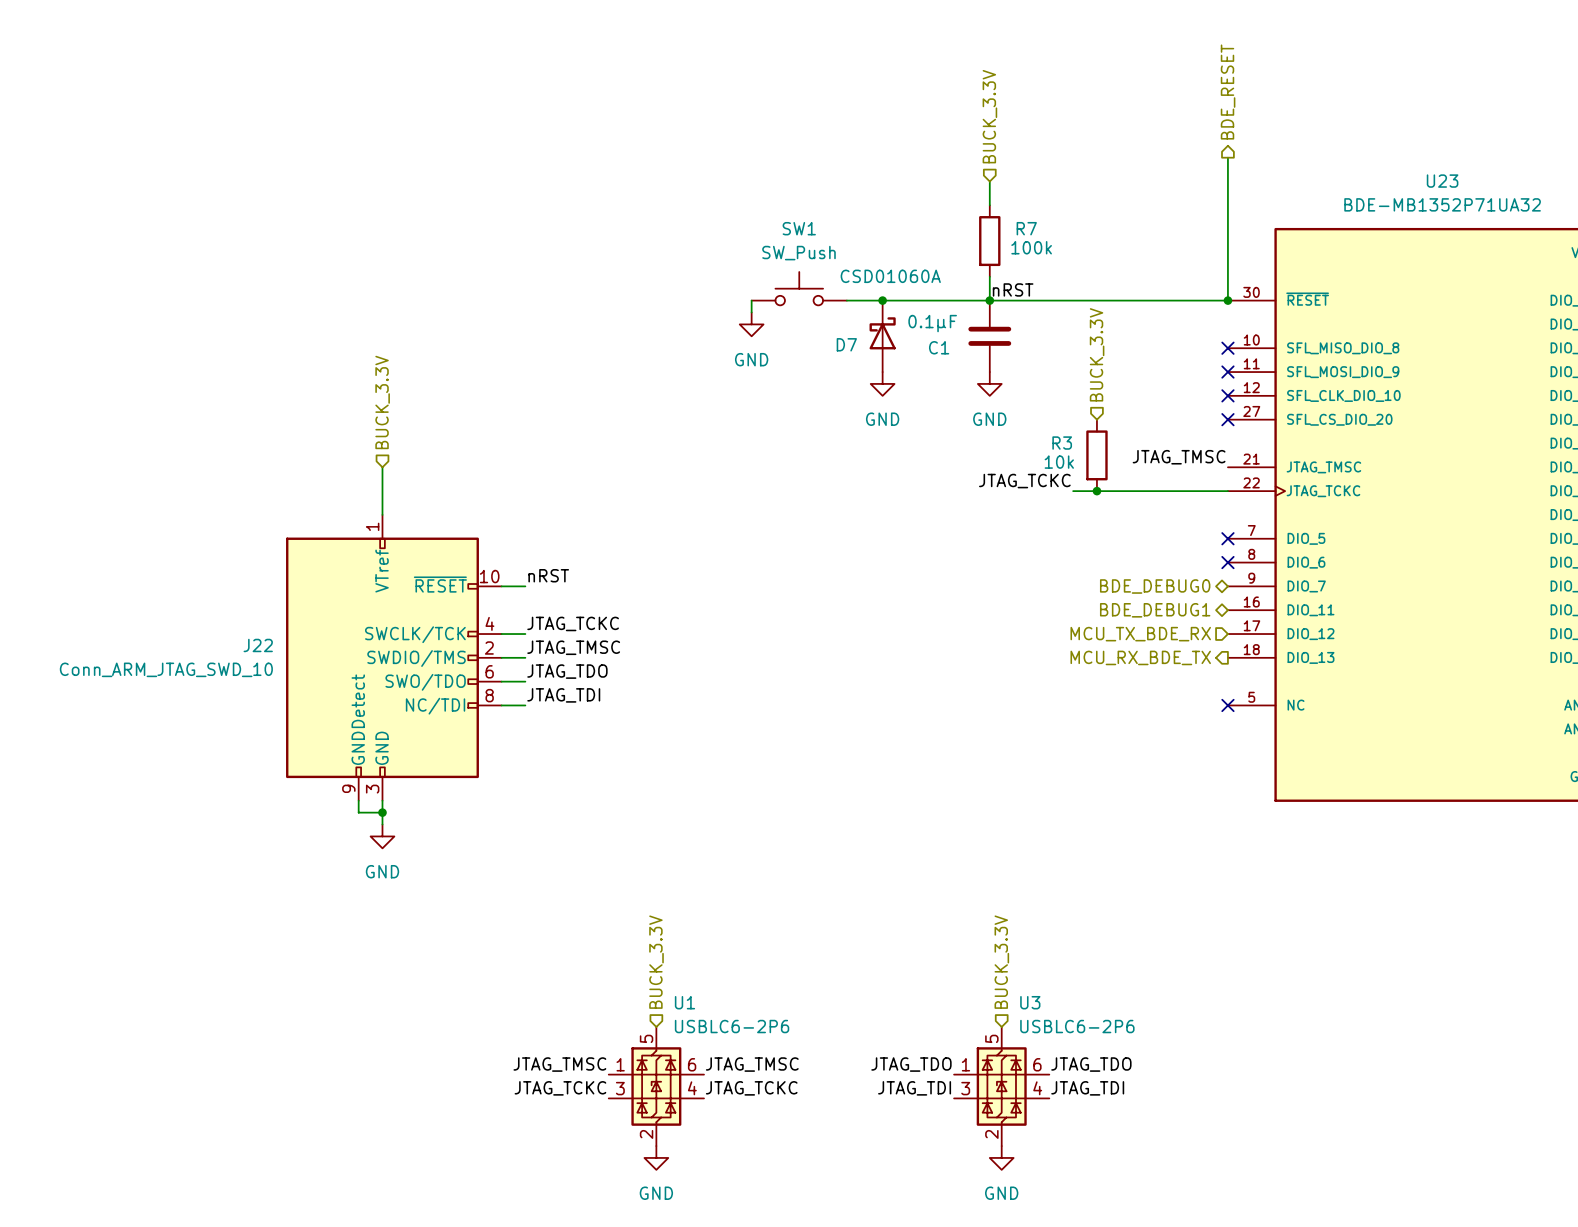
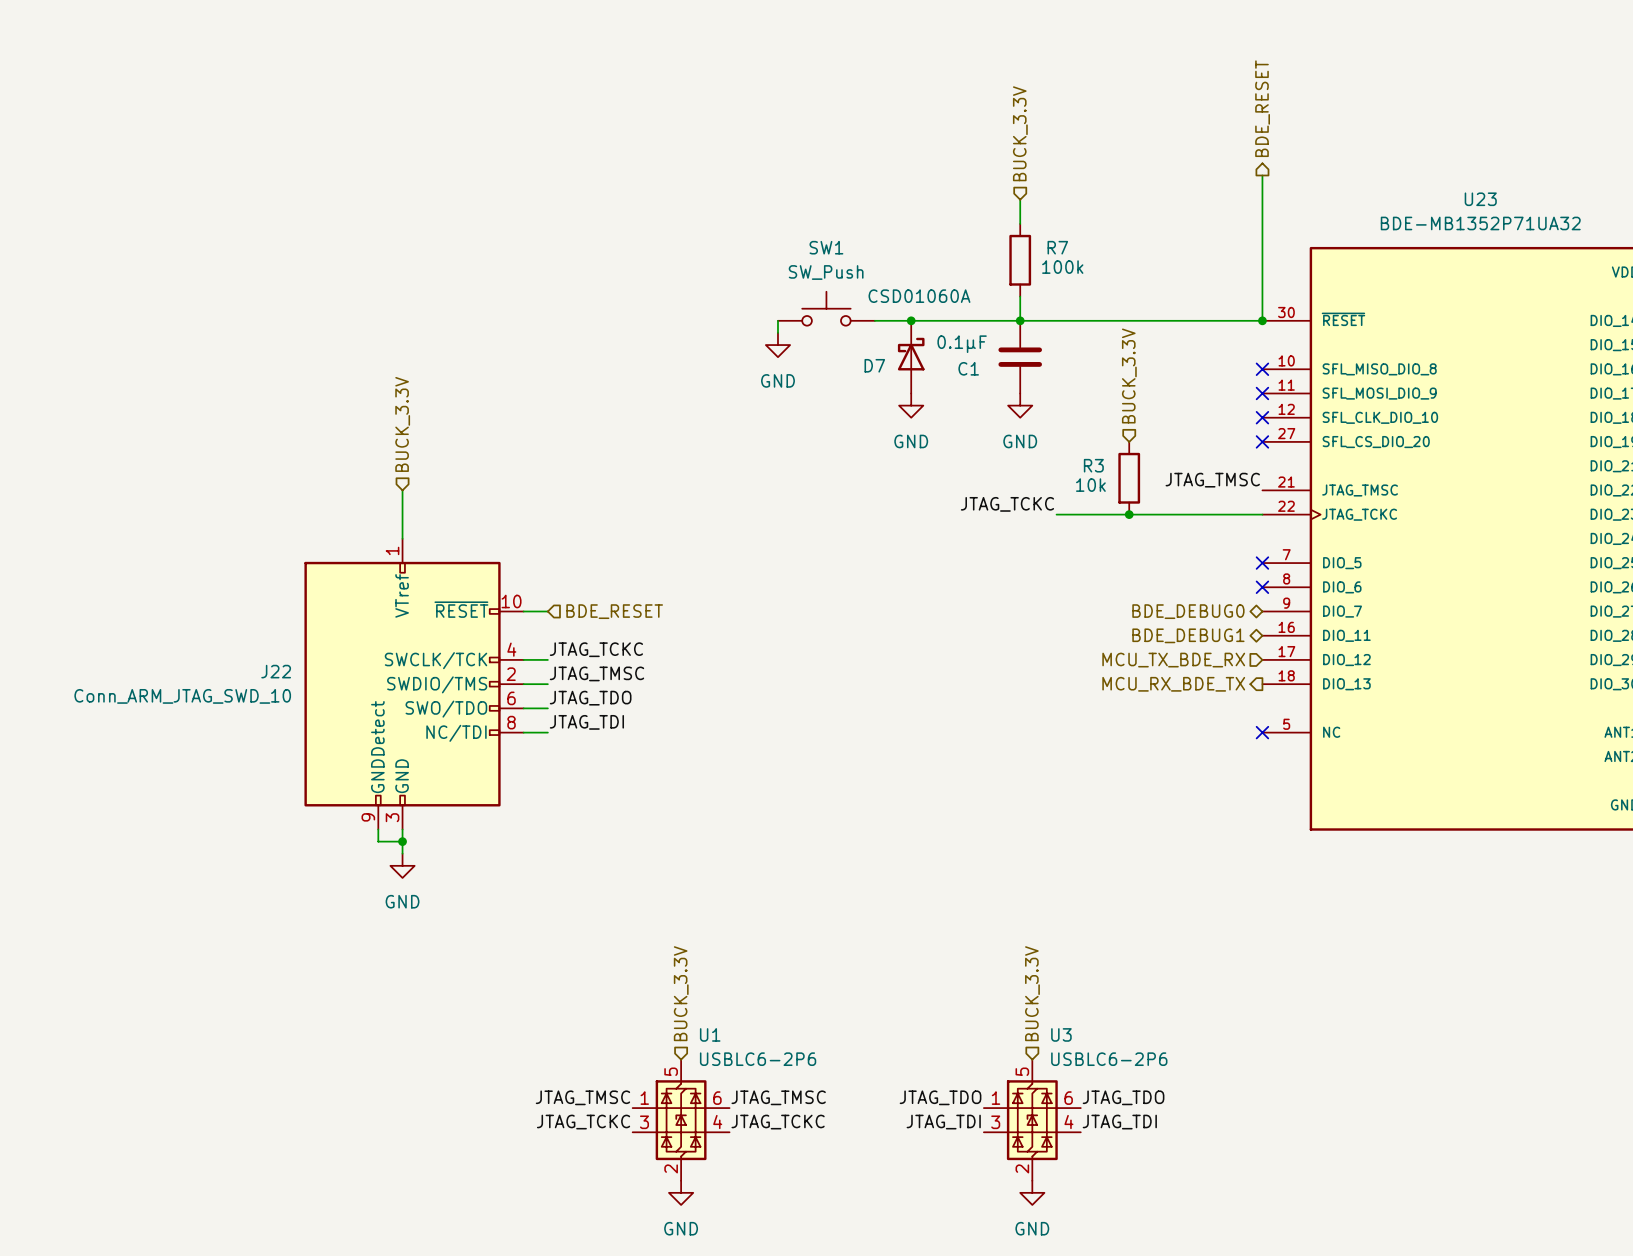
label: nRST (1013, 289) -> none
label position: JTAG_TCKC (1024, 481) -> JTAG_TCKC (1007, 504)
wire: none -> (1056, 514) (1105, 514)
label: nRST (548, 575) -> none
hierarchical label: none -> BDE_RESET (614, 611)

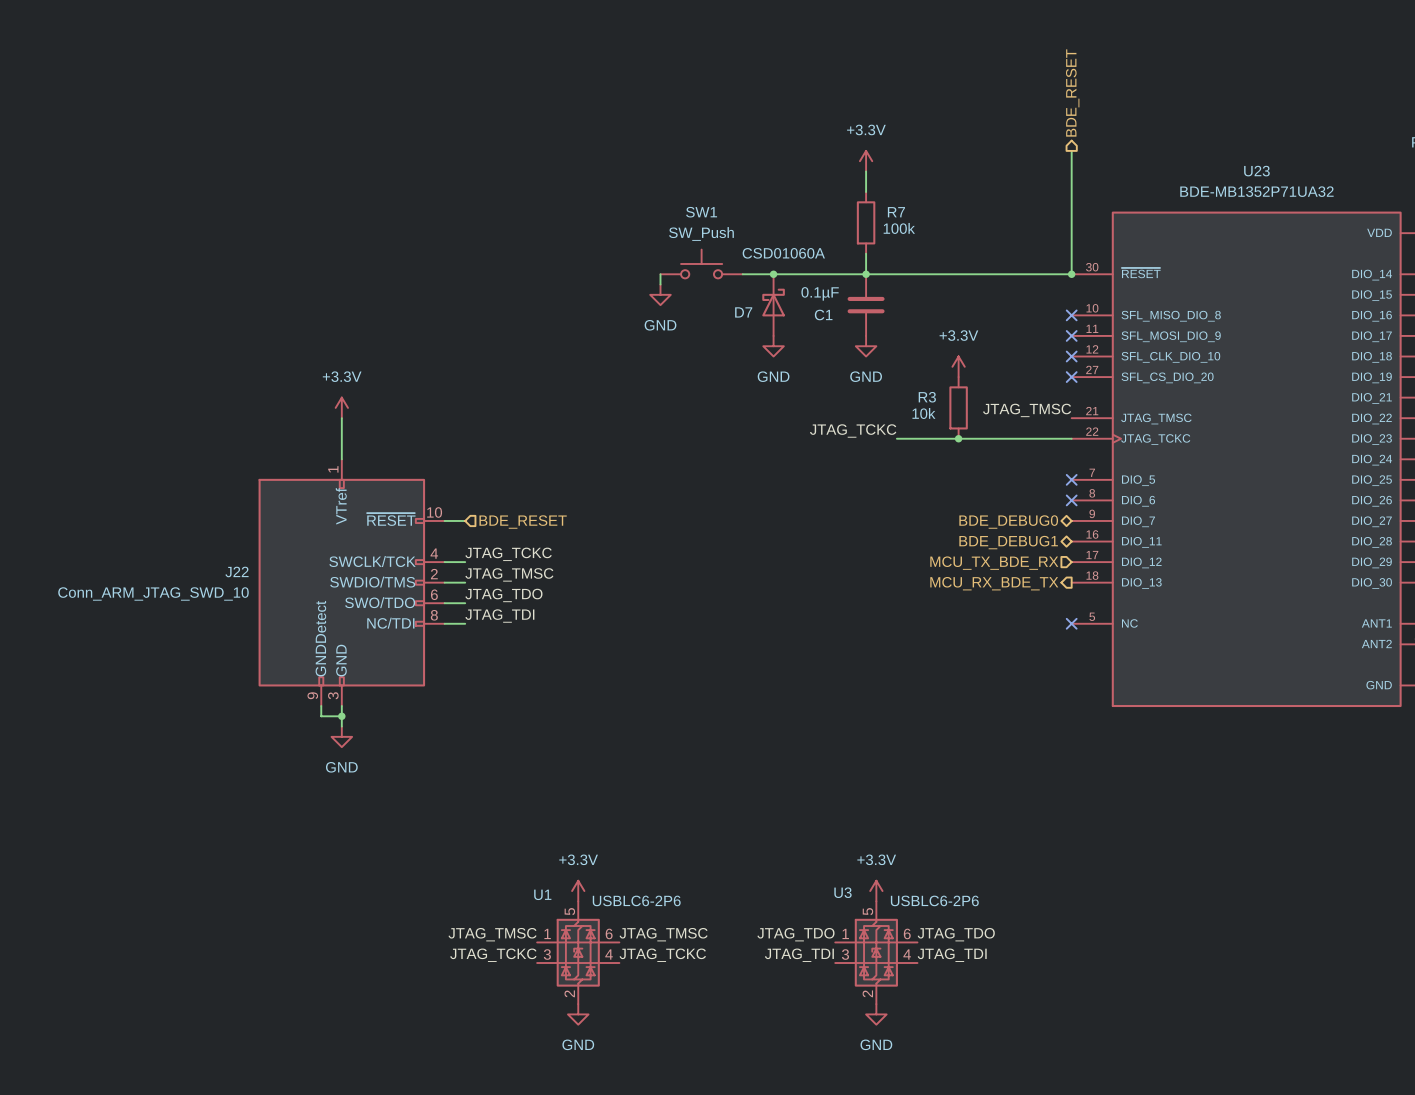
hierarchical label: BUCK_3.3V (1020, 133) -> none
power symbol: none -> +3.3V (866, 161)
hierarchical label: BUCK_3.3V (1129, 376) -> none
hierarchical label: BUCK_3.3V (402, 424) -> none
power symbol: none -> +3.3V (958, 366)
power symbol: none -> +3.3V (341, 407)
hierarchical label: BUCK_3.3V (681, 993) -> none
hierarchical label: BUCK_3.3V (1032, 993) -> none
U1 name position: U1 (710, 1034) -> U1 (542, 894)
U3 name position: U3 (1061, 1034) -> U3 (842, 892)
power symbol: none -> +3.3V (578, 891)
power symbol: none -> +3.3V (876, 891)

